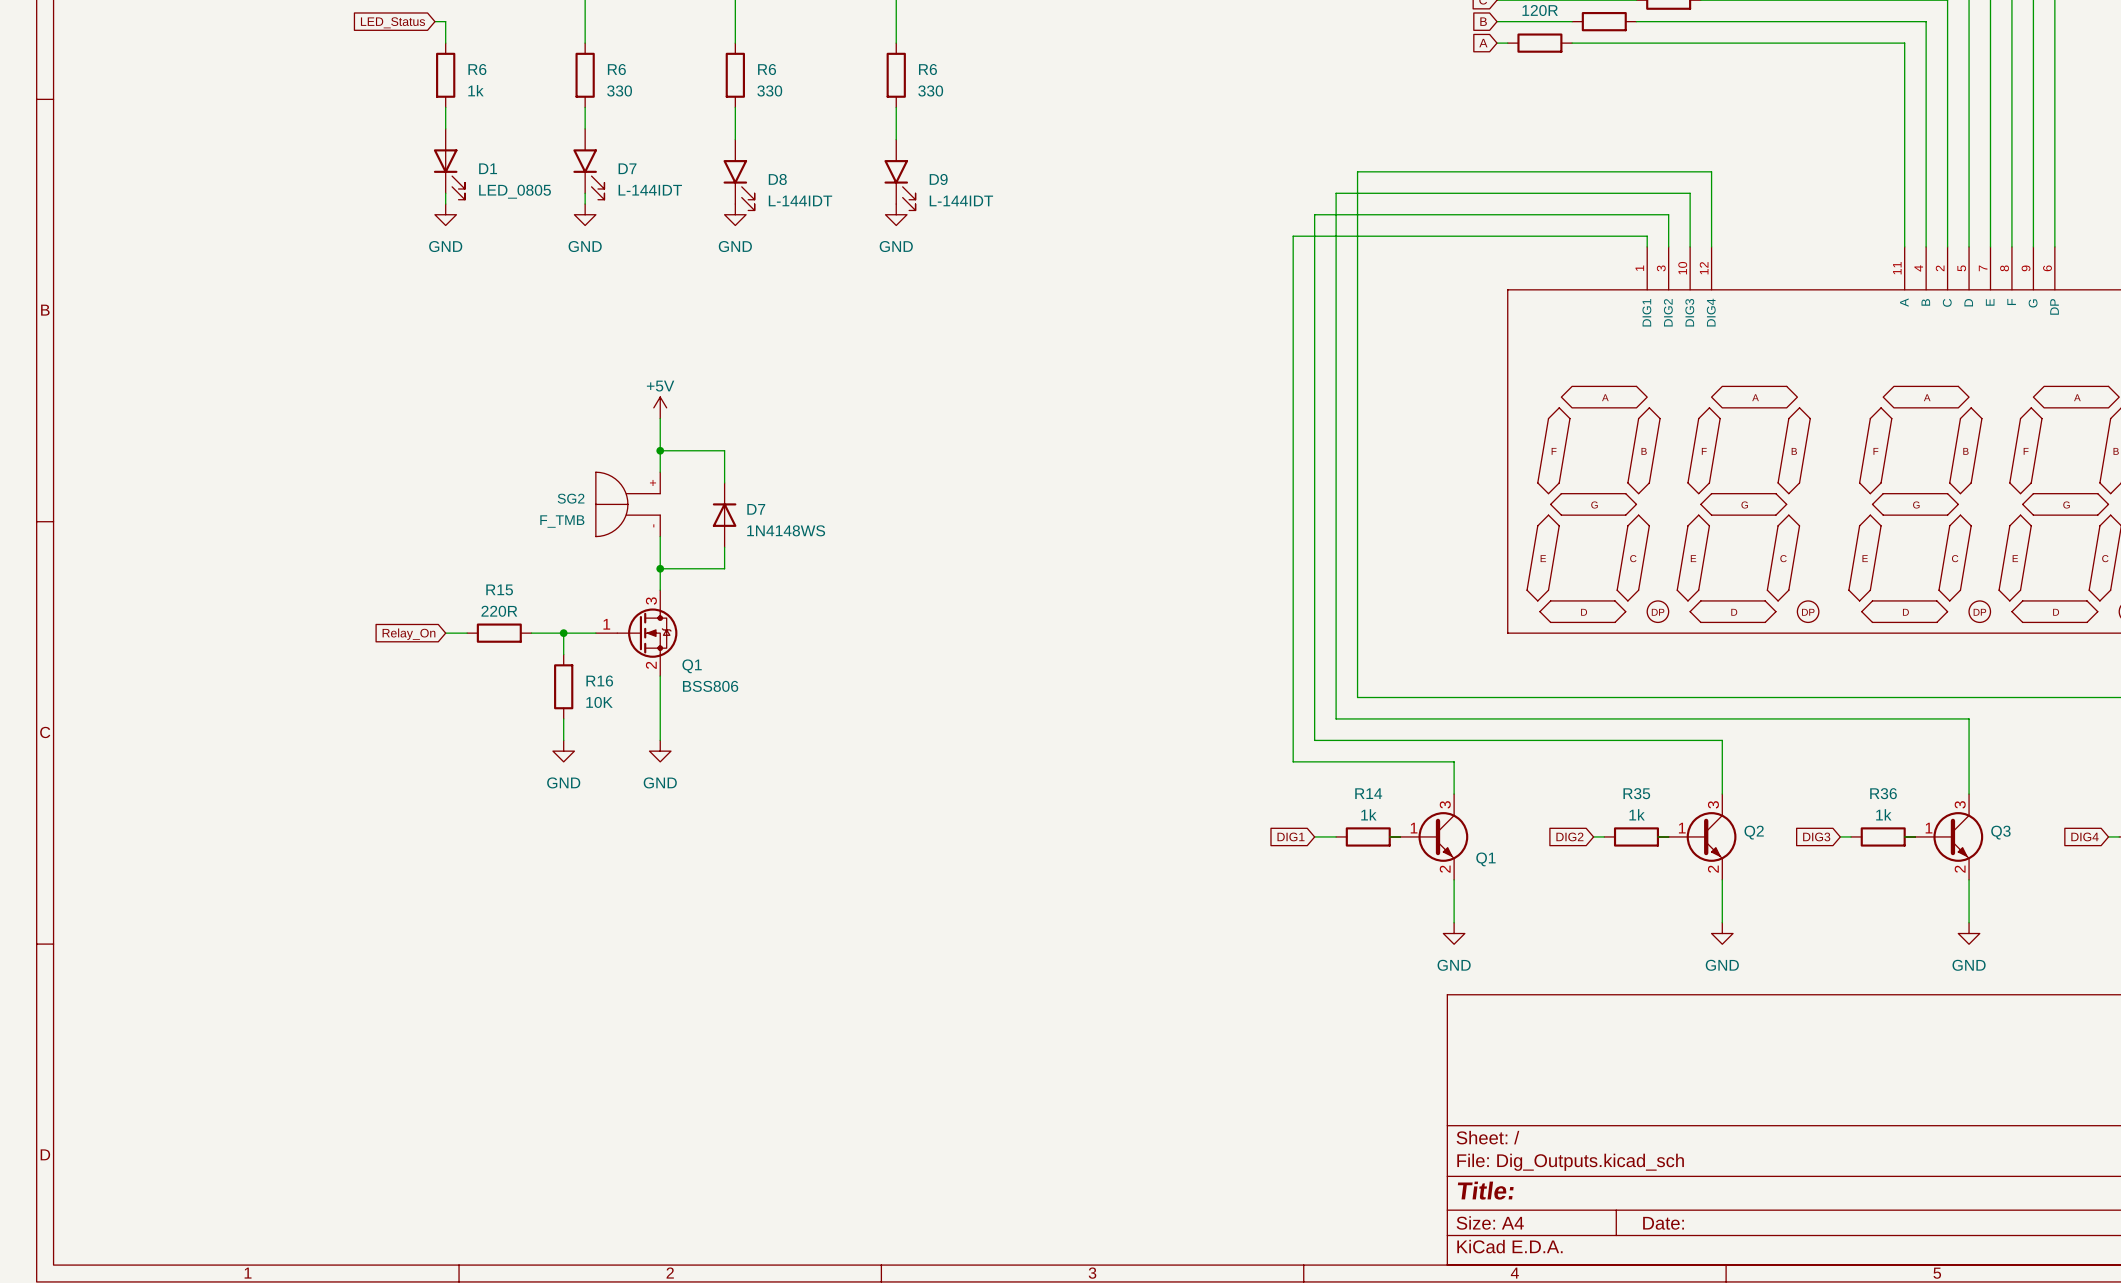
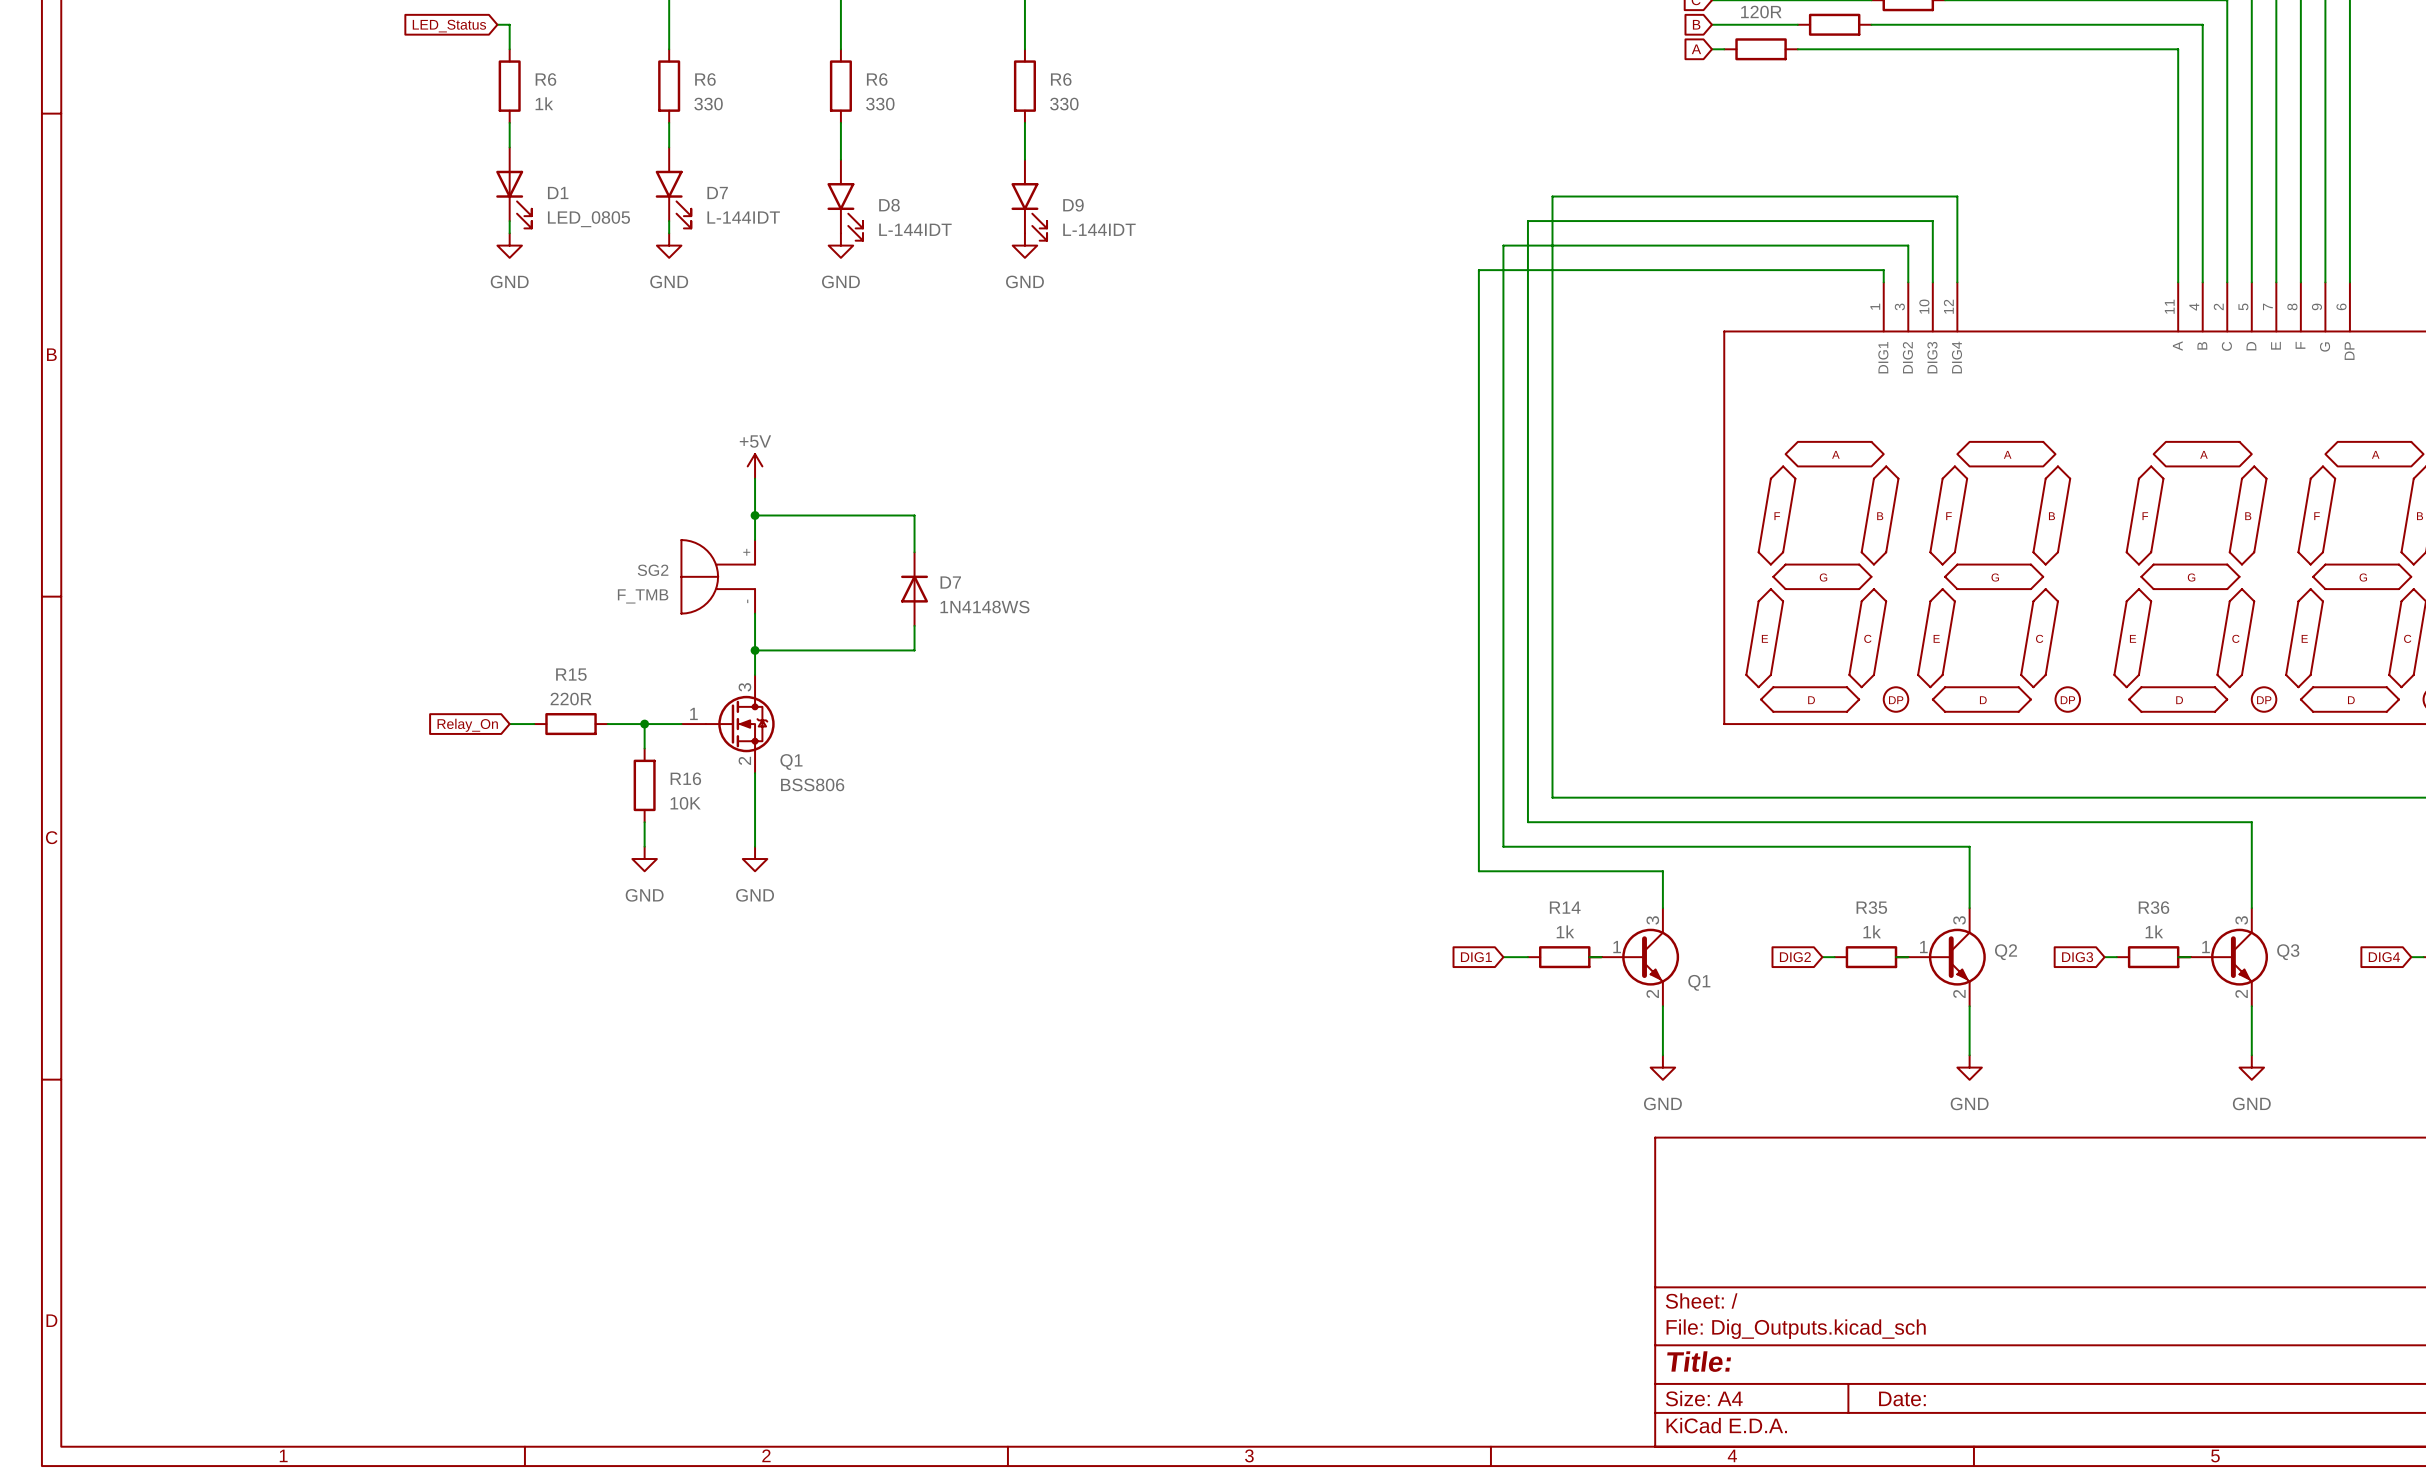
wire: (724, 450) (724, 482) -> (828, 515) (914, 515) (914, 552)
D7 position: (724, 515) -> (914, 589)
wire: (724, 547) (724, 568) -> (914, 625) (914, 650) (828, 650)

